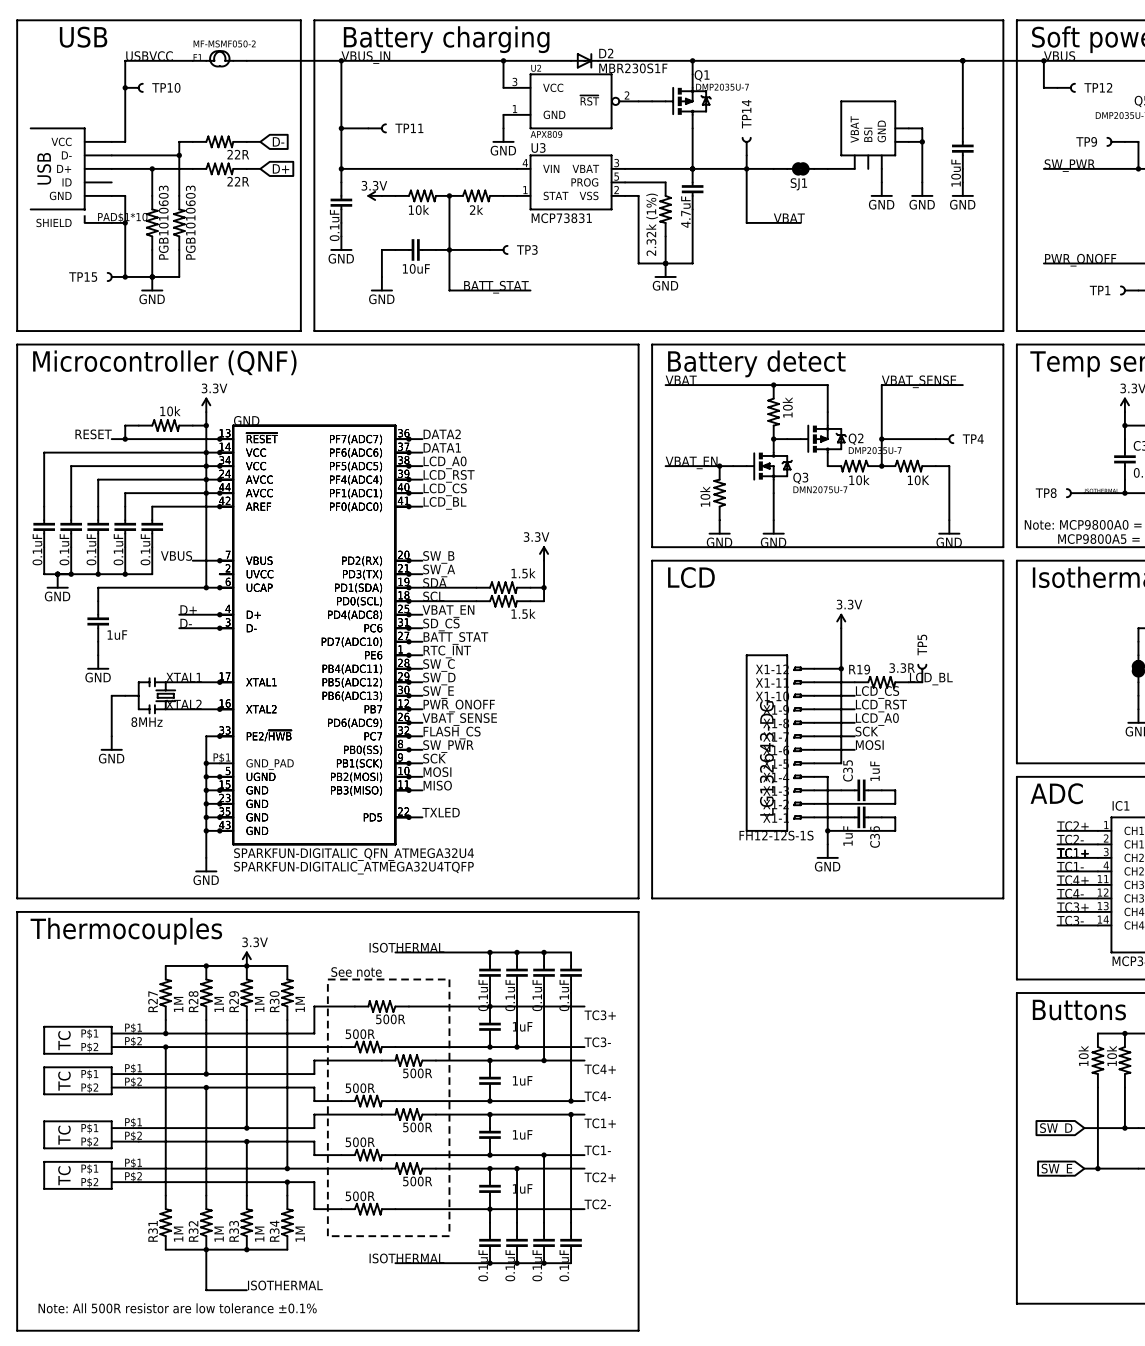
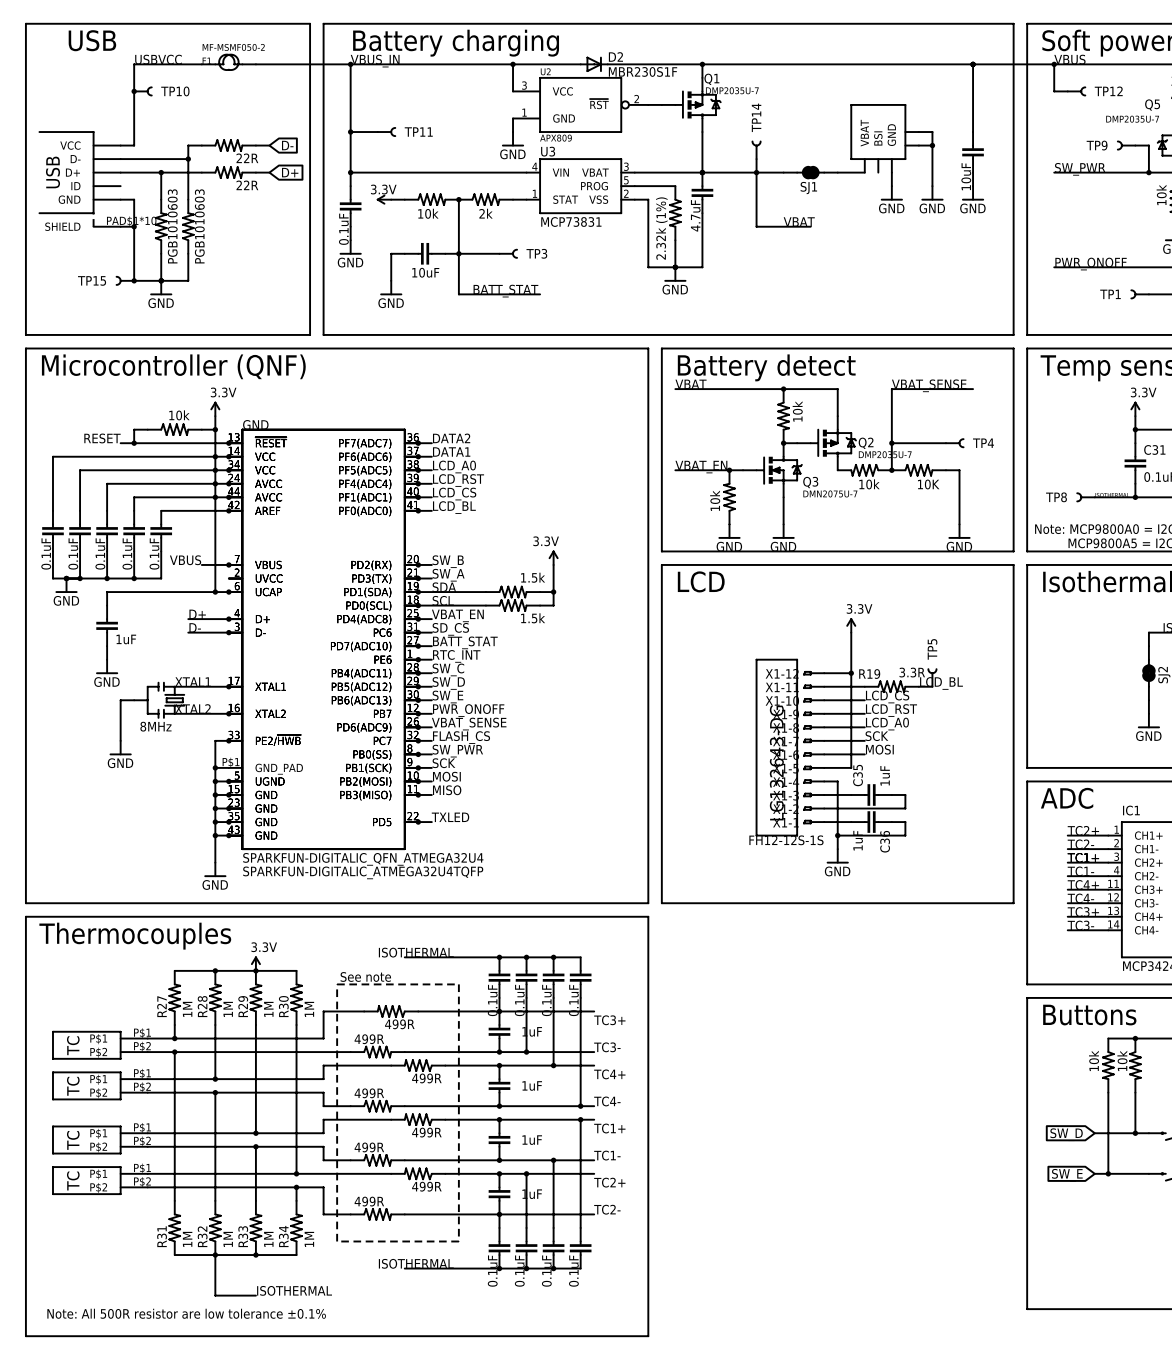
part value: 500R (390, 1019) -> 499R (399, 1024)
part value: 500R (360, 1034) -> 499R (369, 1039)
part value: 500R (417, 1073) -> 499R (426, 1078)
part value: 500R (360, 1088) -> 499R (369, 1093)
part value: 500R (417, 1127) -> 499R (426, 1132)
part value: 500R (360, 1142) -> 499R (369, 1147)
part value: 500R (417, 1181) -> 499R (426, 1186)
part value: 500R (360, 1196) -> 499R (369, 1201)

